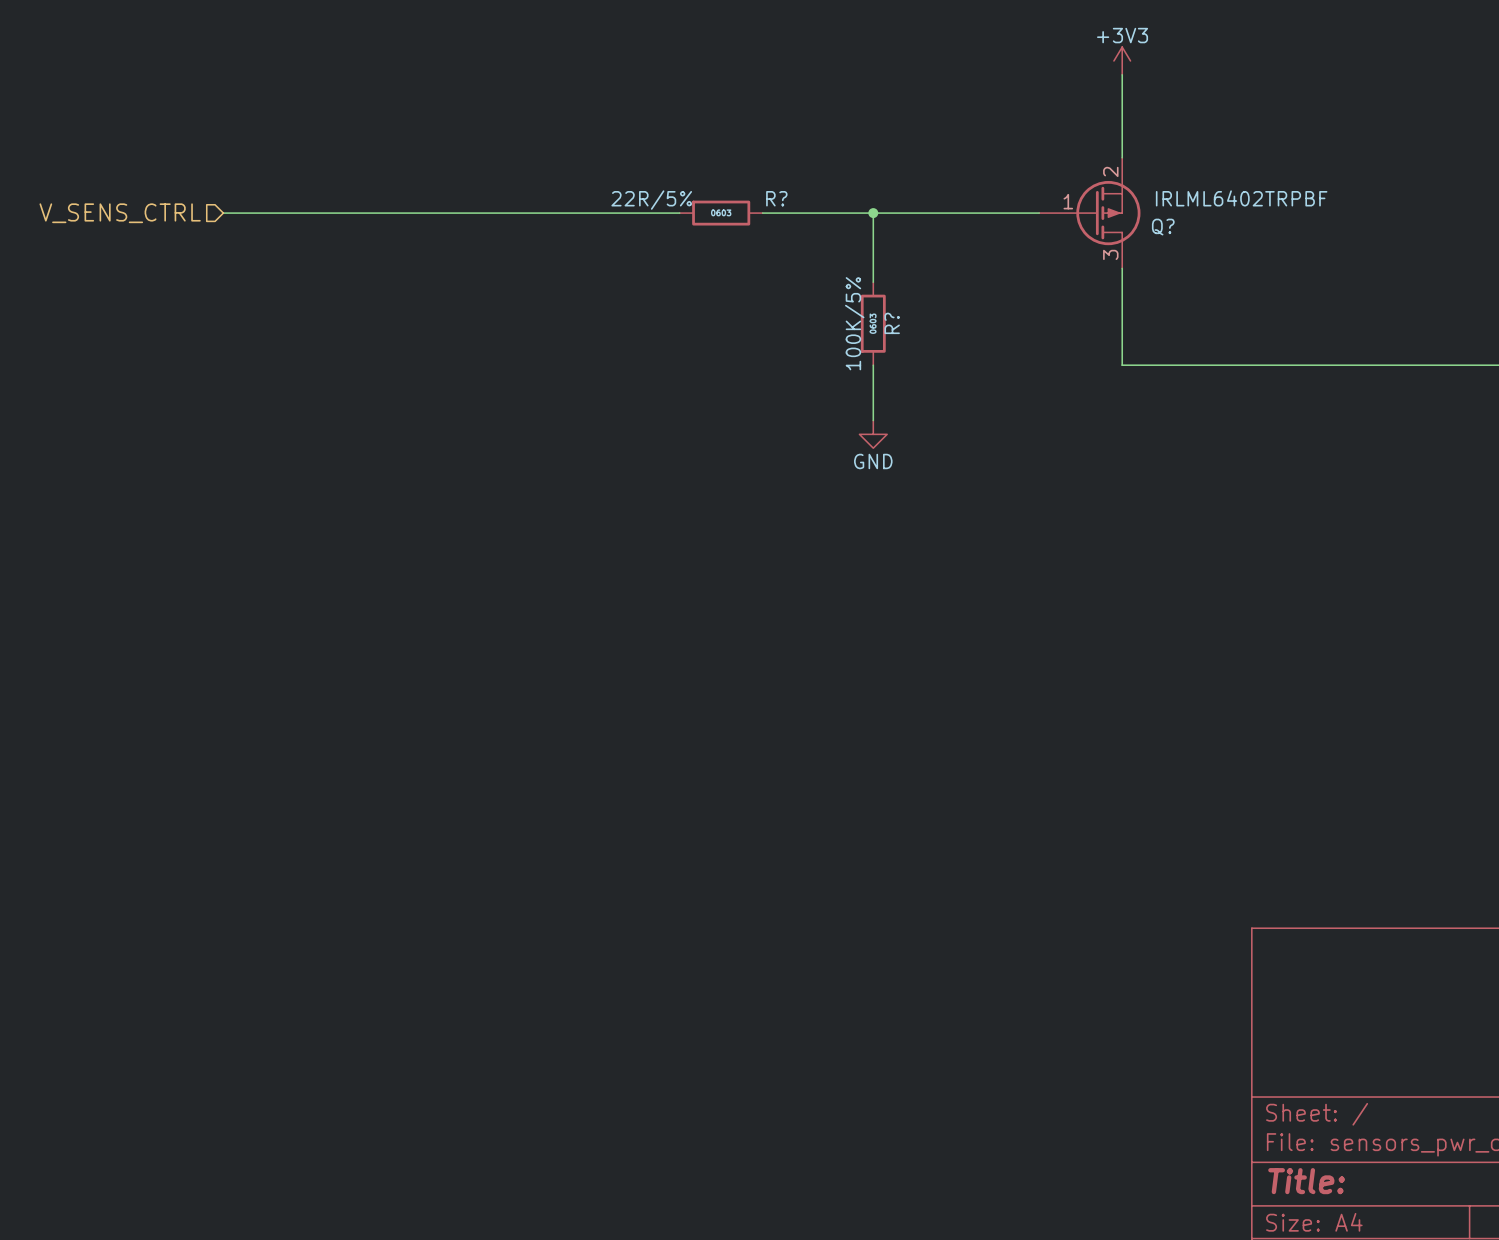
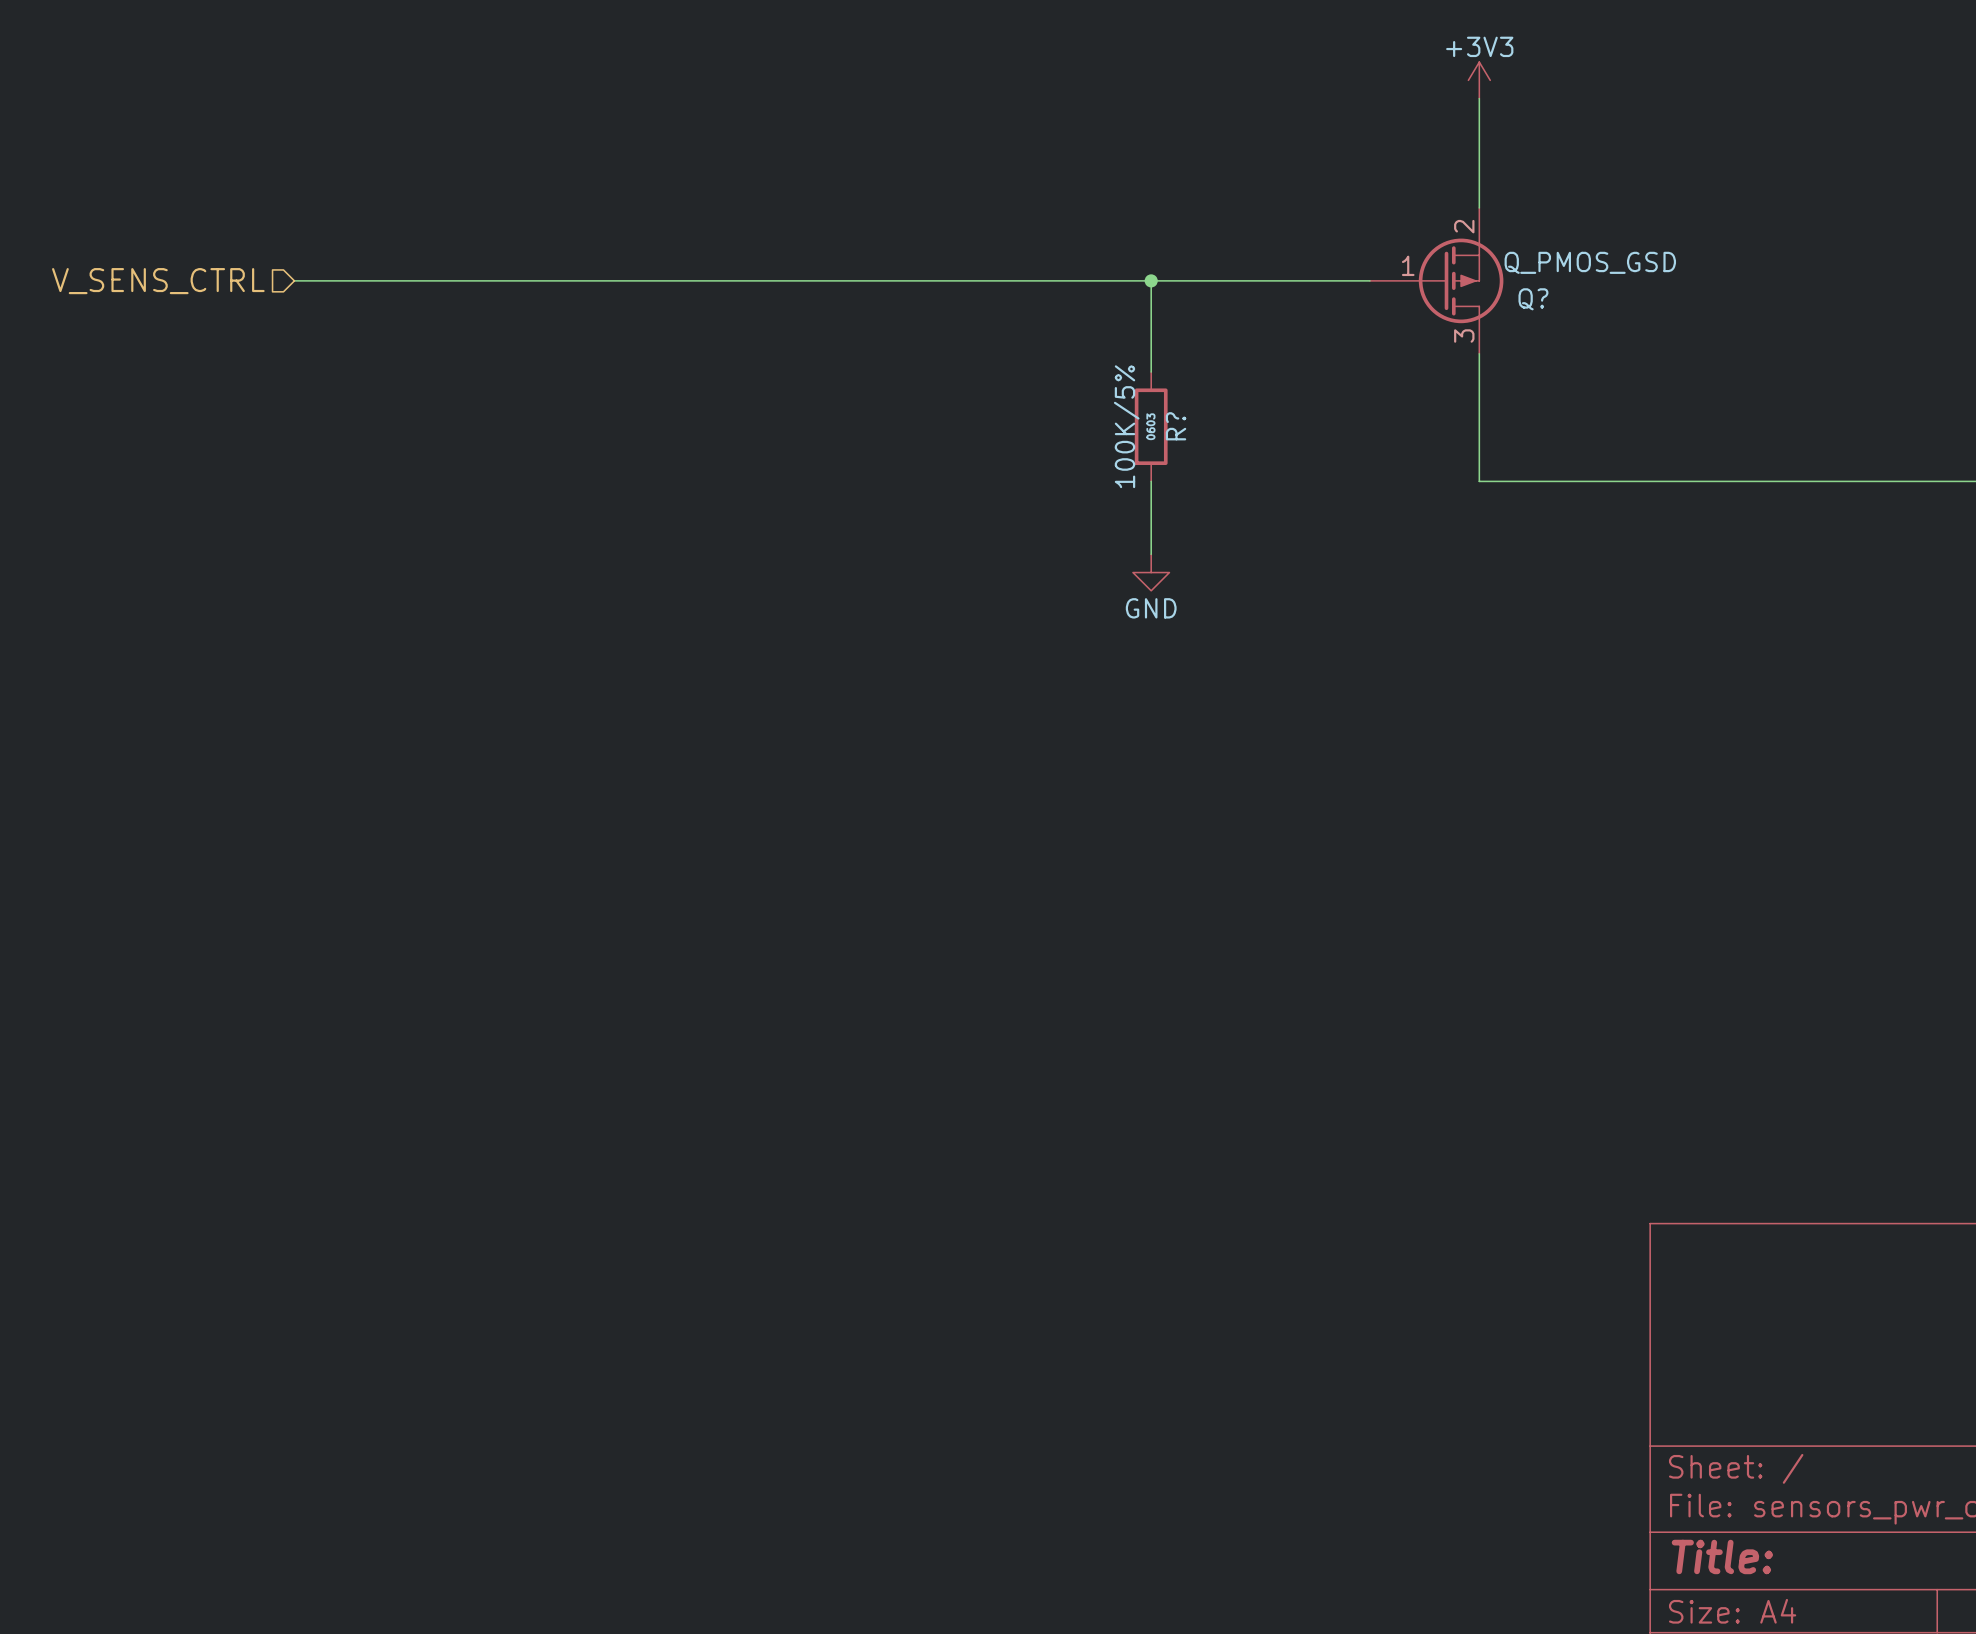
Q? value: IRLML6402TRPBF (1241, 198) -> Q_PMOS_GSD (1590, 262)
wire: none -> (895, 280) (1005, 280)
R?: 22R/5% (721, 213) -> none

